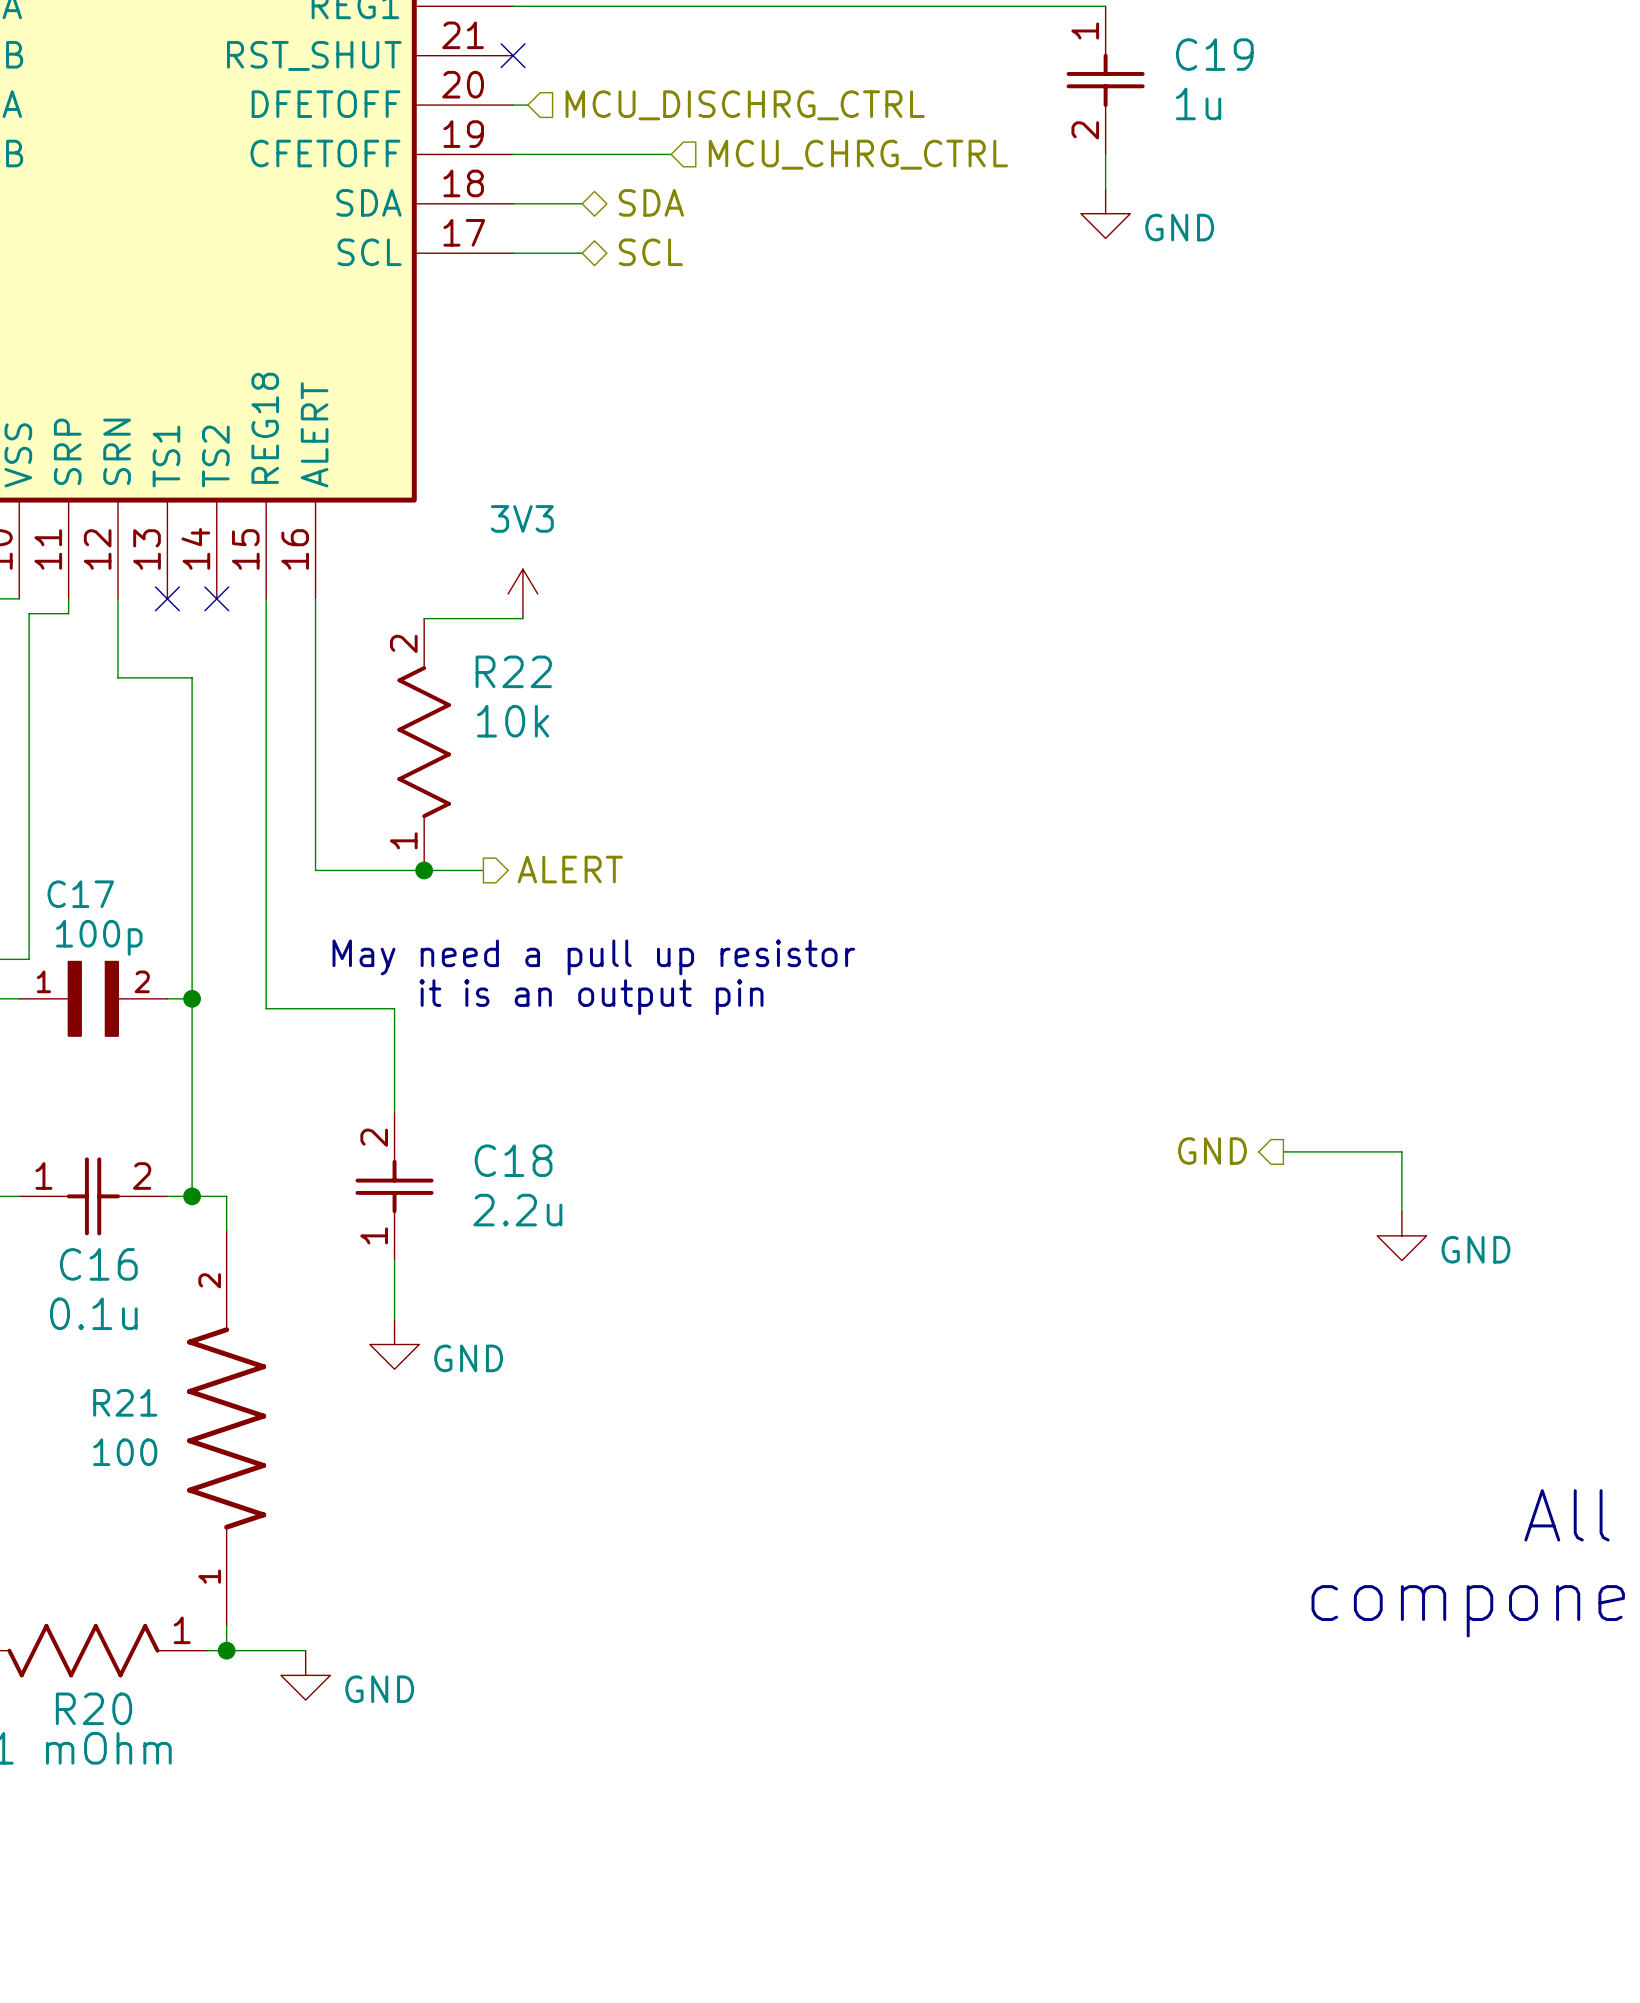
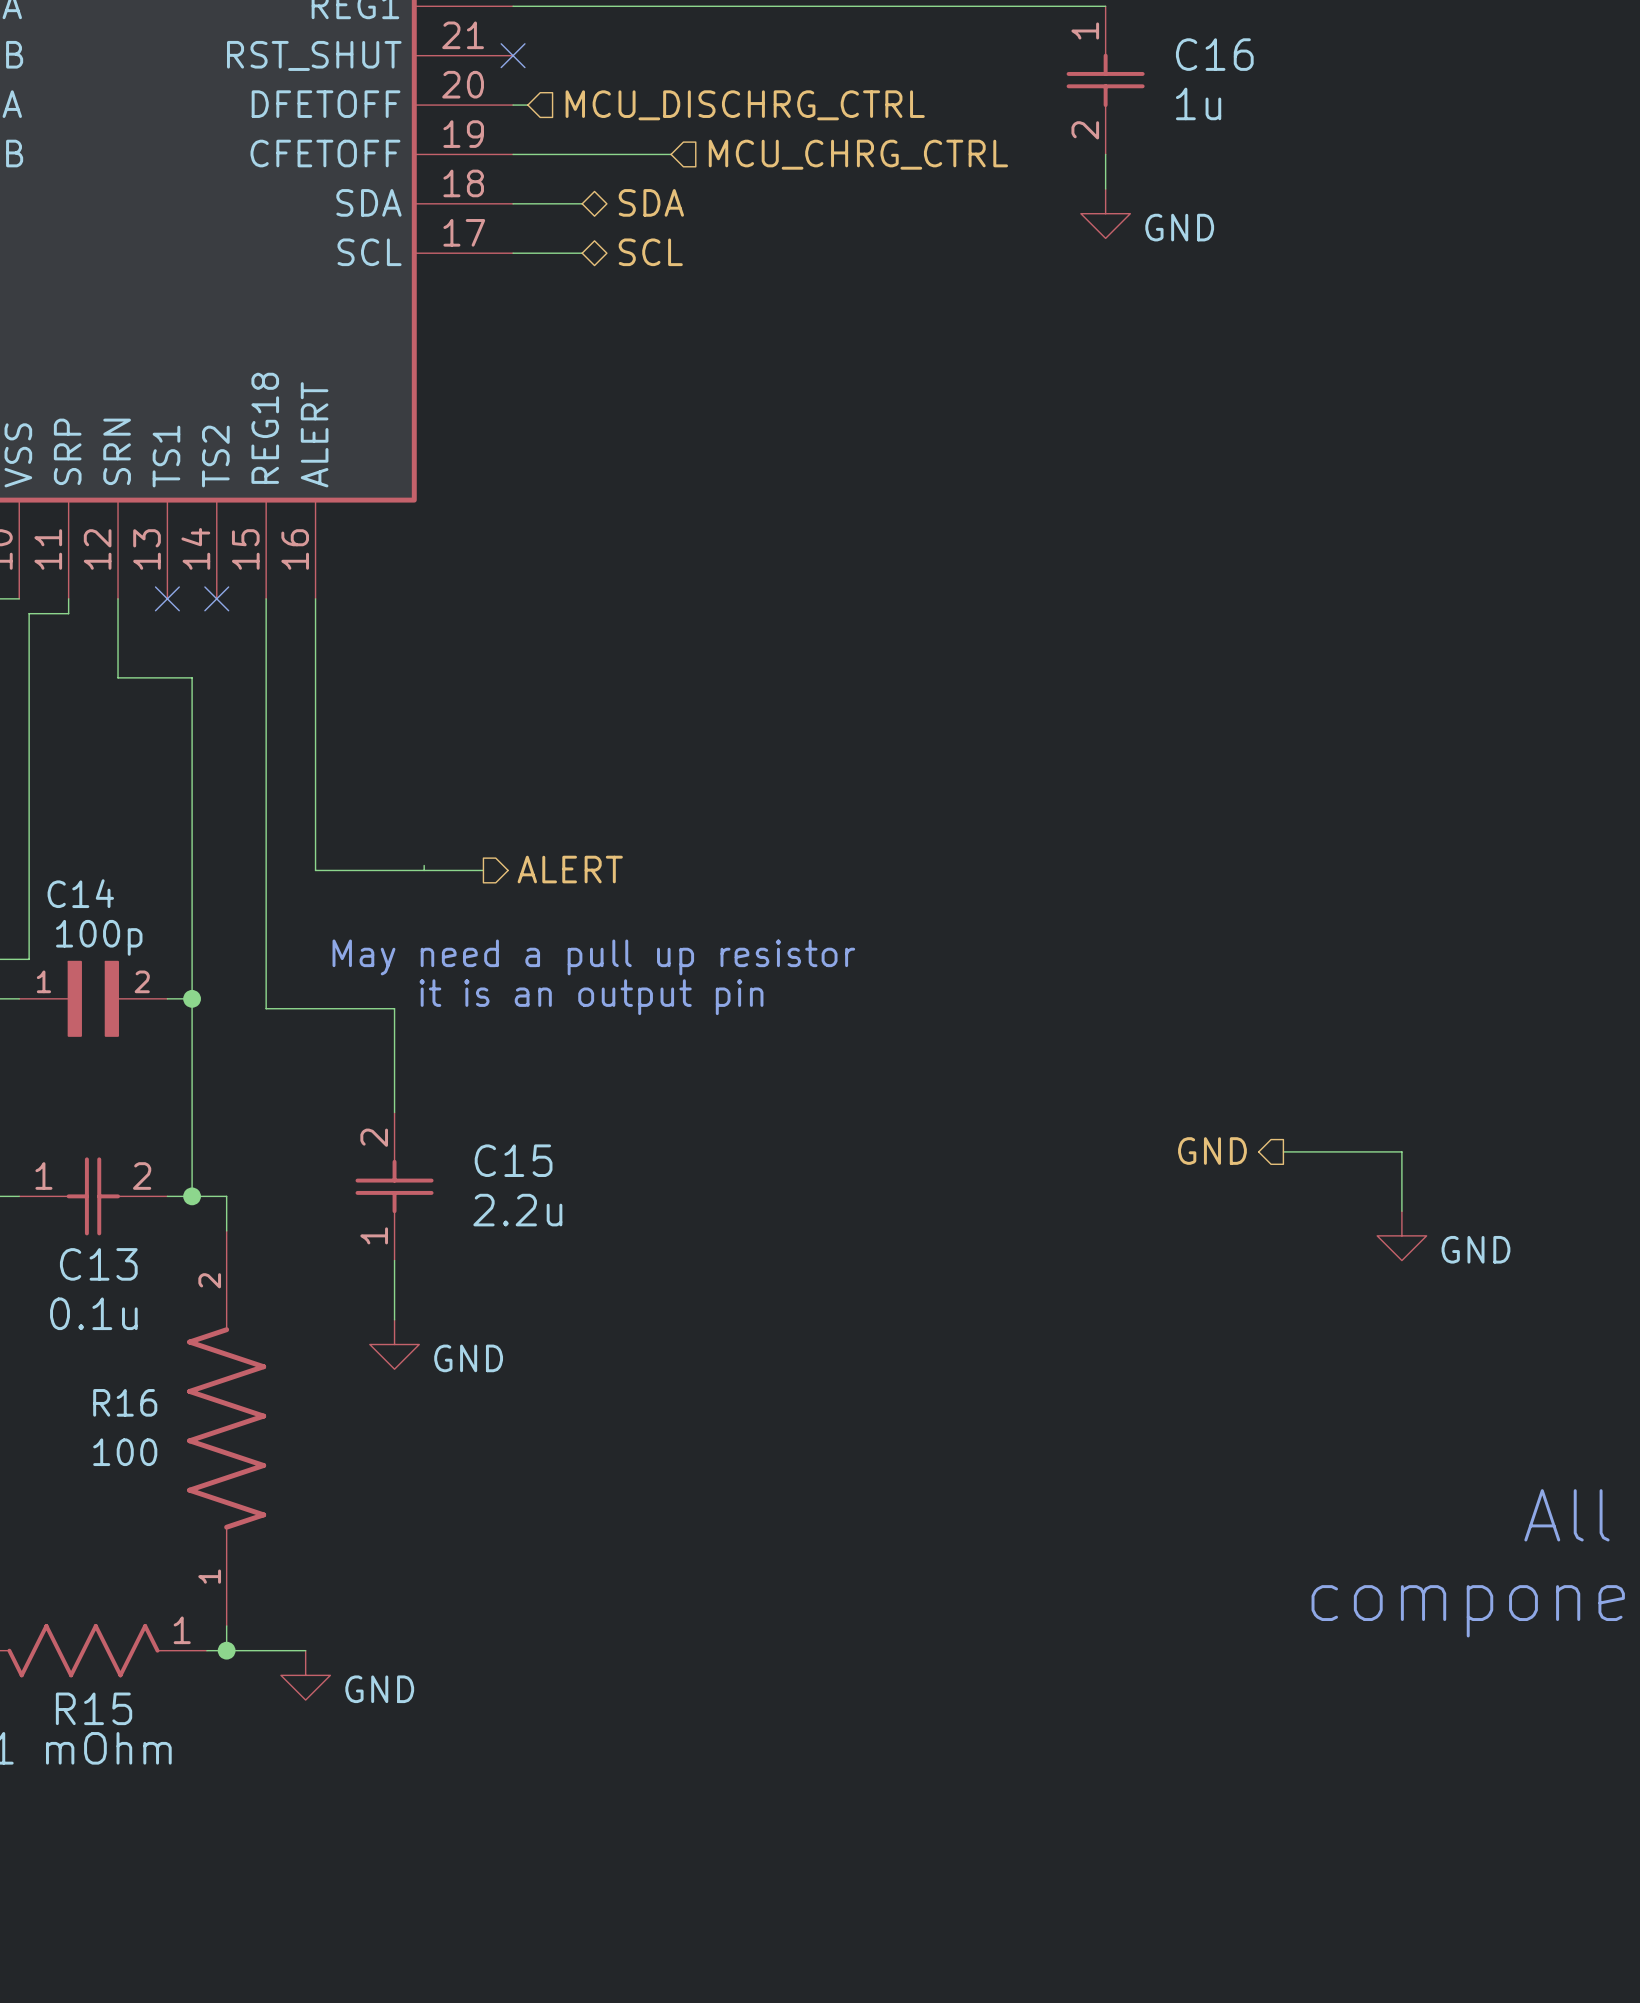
C19 name: C19 (1214, 54) -> C16 (1214, 54)
power symbol: 3V3 (522, 593) -> none
wire: (424, 618) (522, 618) -> none
R22: 10k (424, 742) -> none
junction: (424, 870) -> none
C17 name: C17 (80, 894) -> C14 (80, 893)
C18 name: C18 (513, 1160) -> C15 (513, 1160)
C16 name: C16 (98, 1264) -> C13 (98, 1264)
R21 name: R21 (125, 1402) -> R16 (125, 1402)
R20 name: R20 (94, 1708) -> R15 (94, 1708)

